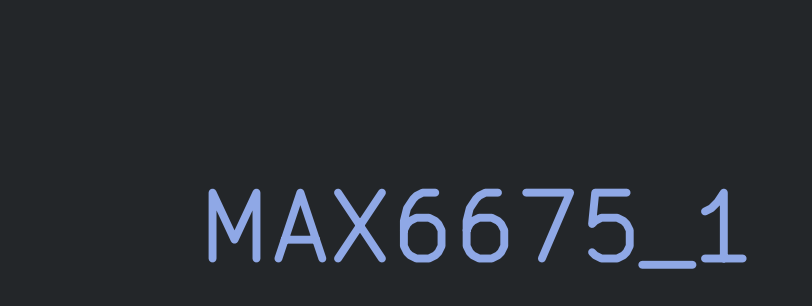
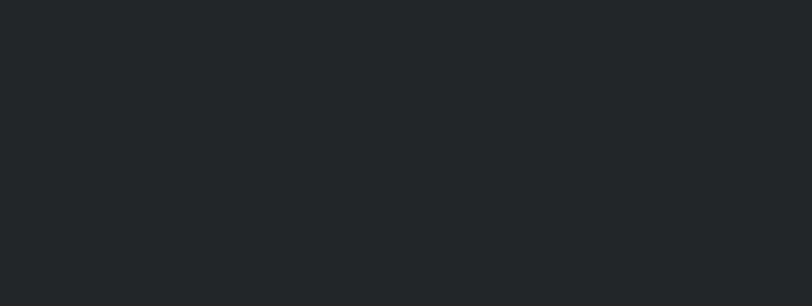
text: MAX6675_1 (477, 228) -> none

